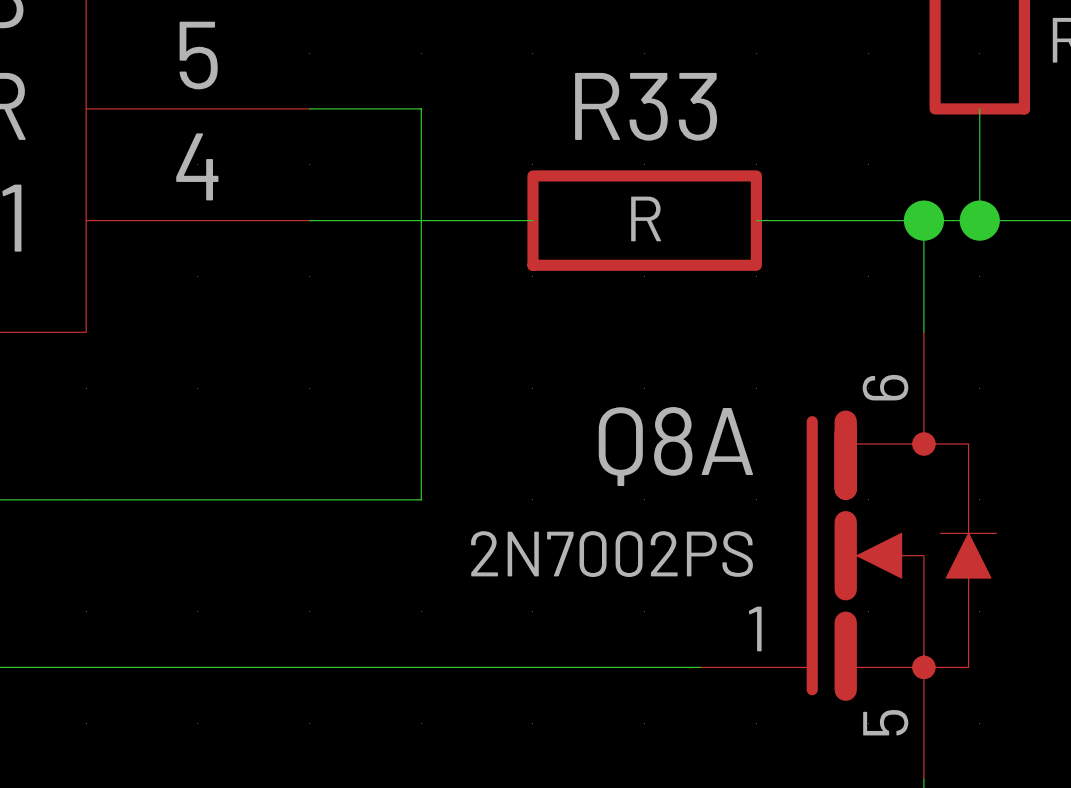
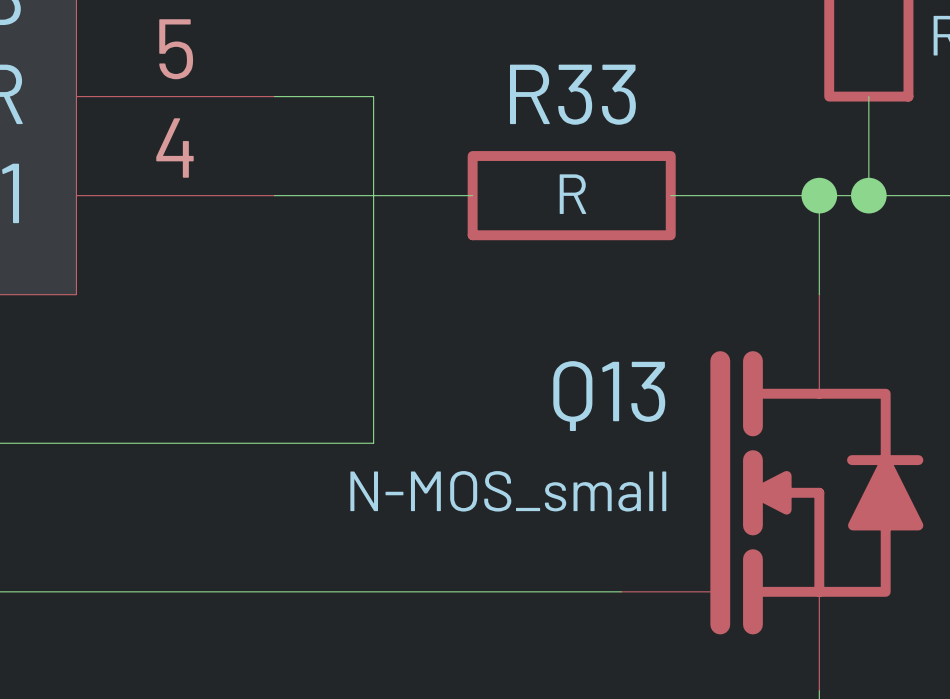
Q8A: 2N7002PS (848, 555) -> none
Q13: none -> N-MOS_small (772, 492)

